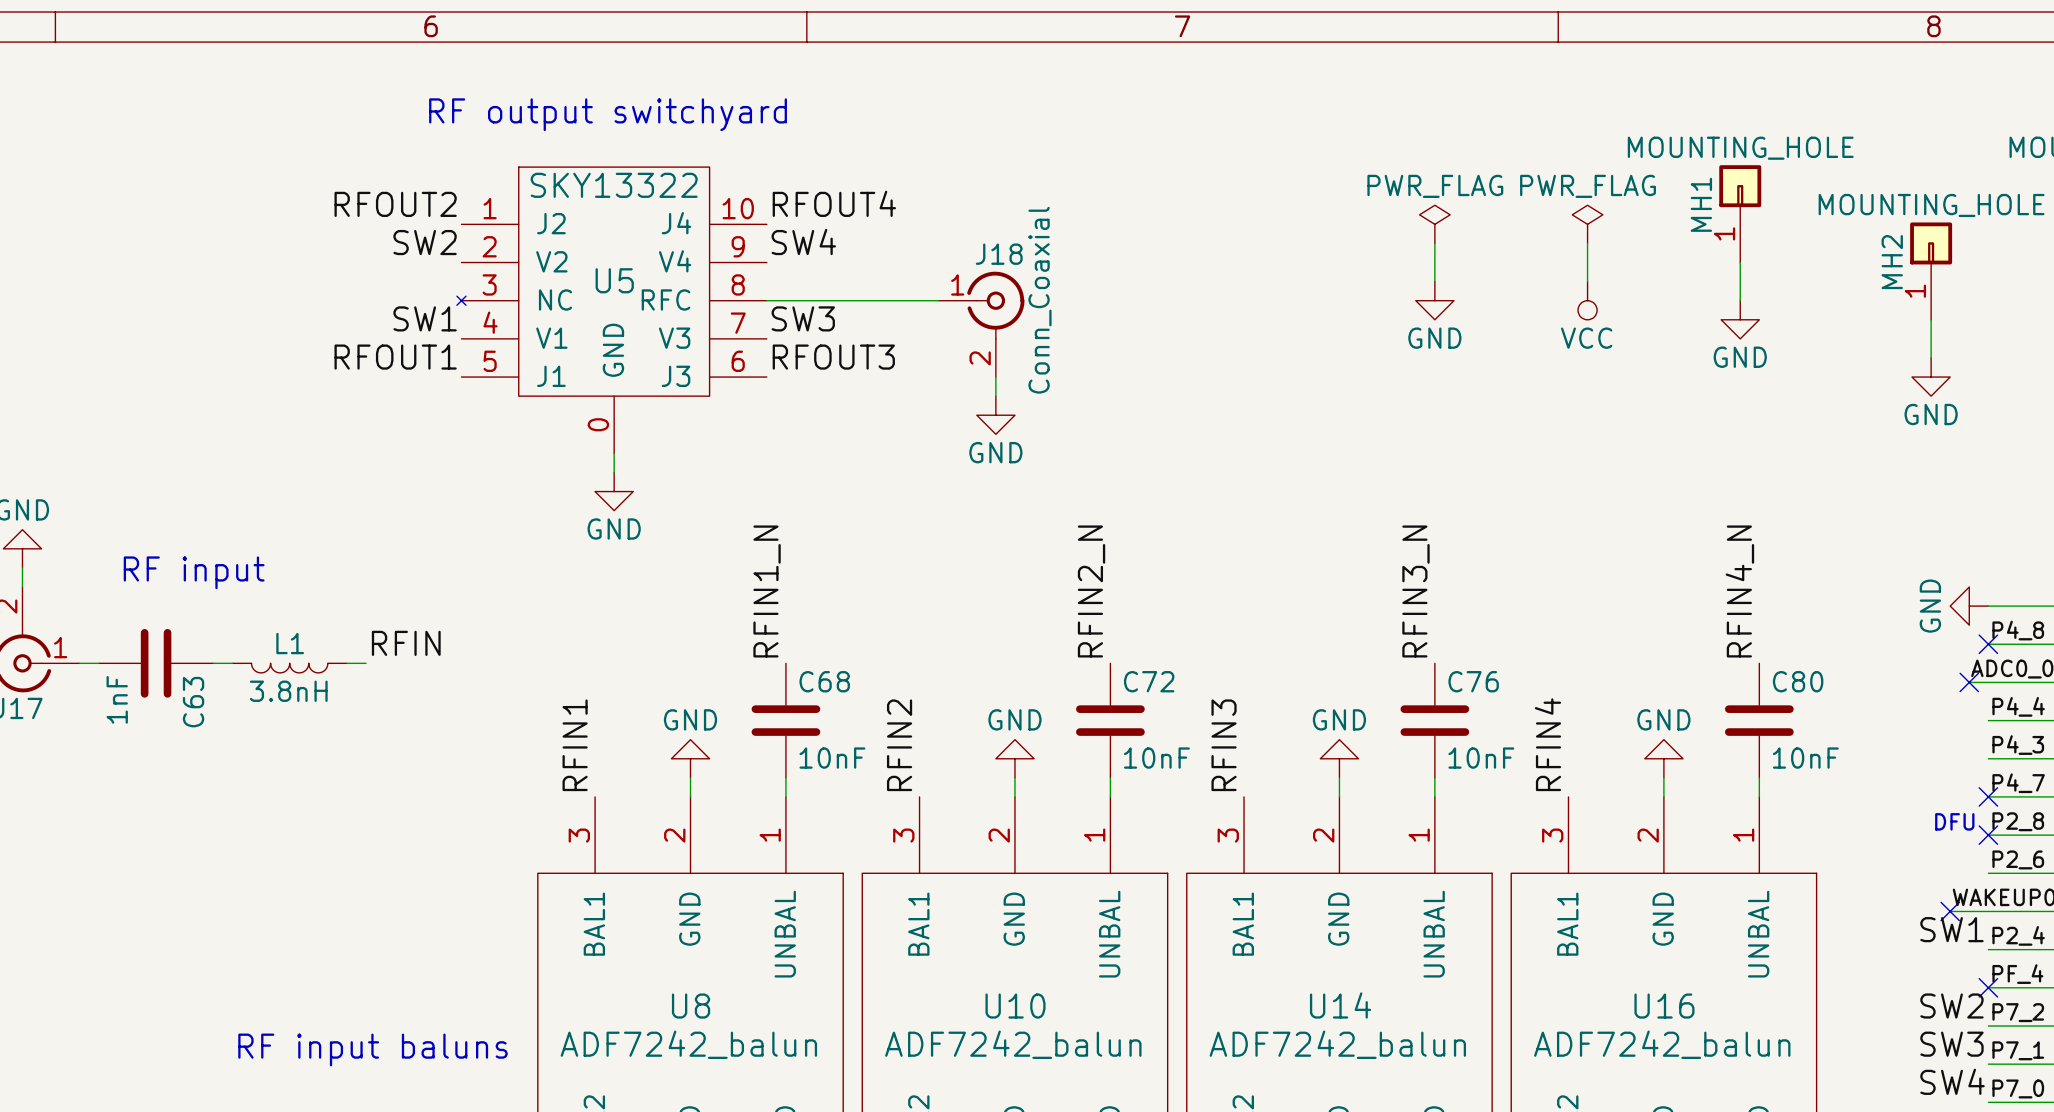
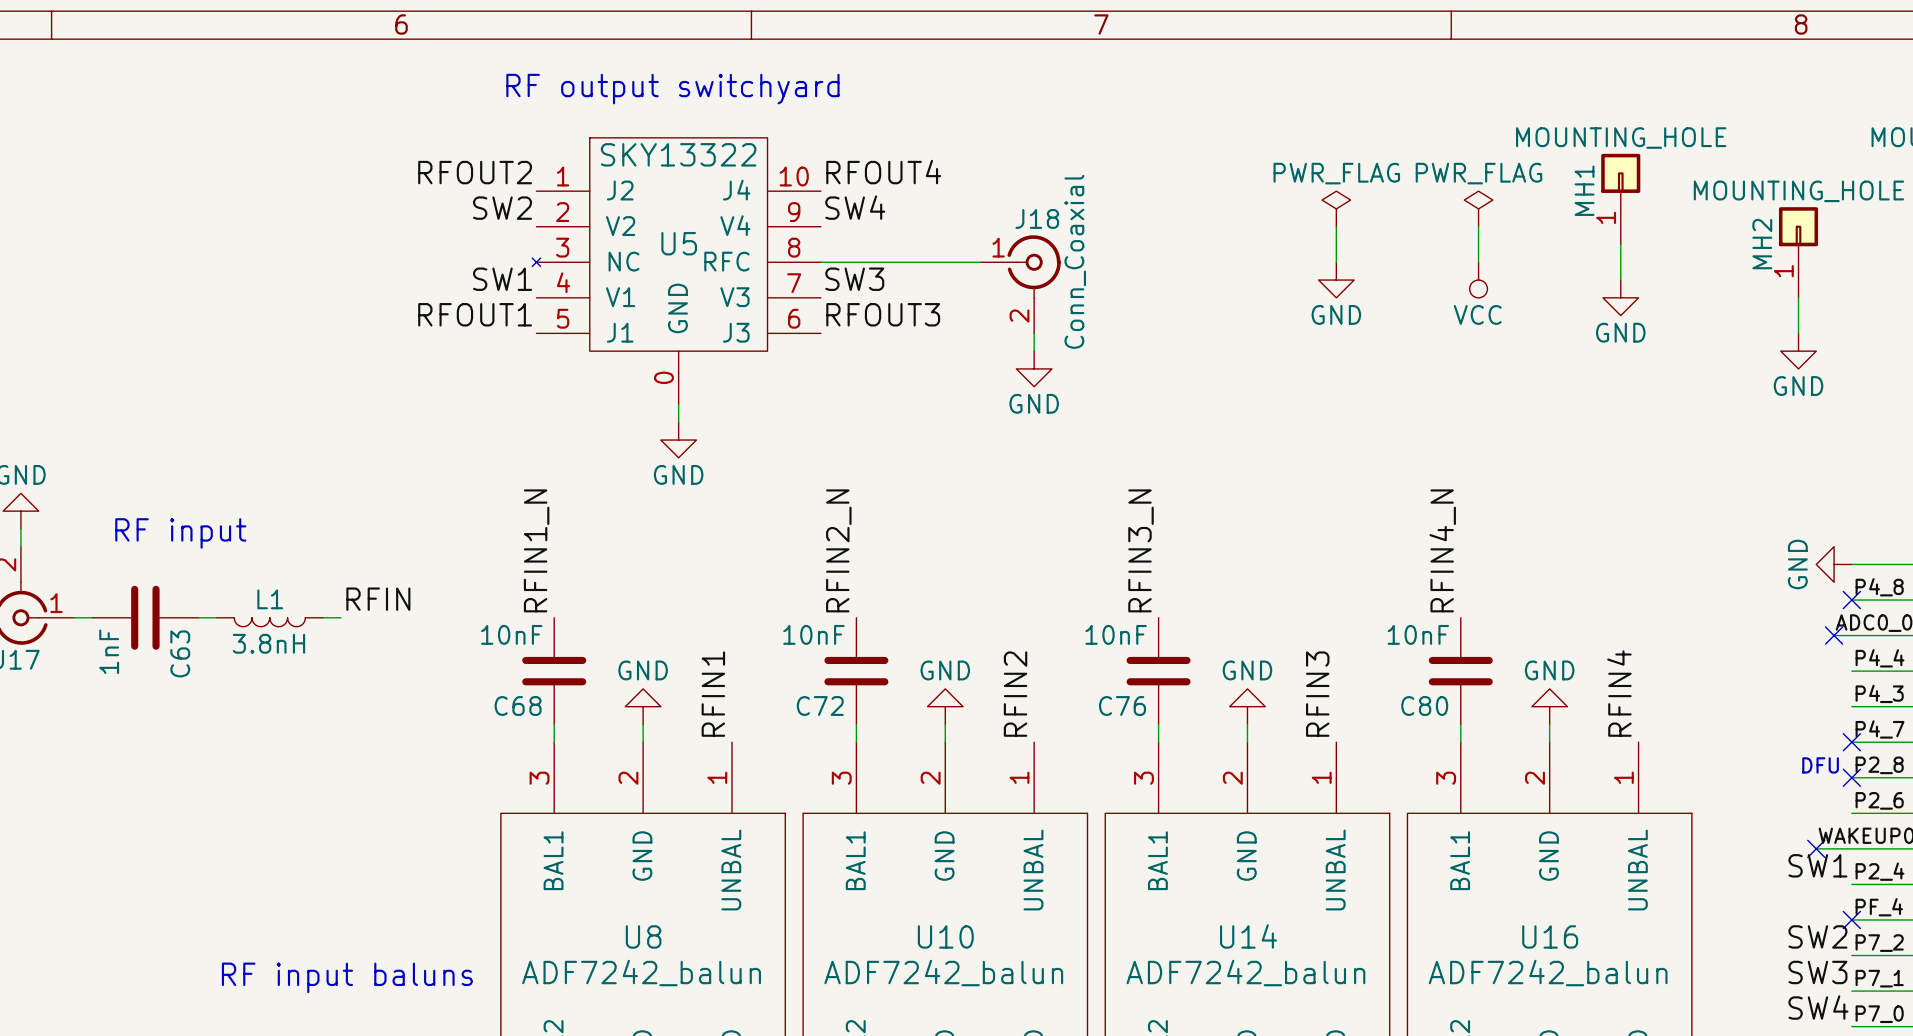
text position: RF output switchyard (608, 114) -> RF output switchyard (672, 89)
label position: RFOUT4 (834, 203) -> RFOUT4 (883, 172)
label position: RFOUT2 (395, 204) -> RFOUT2 (475, 172)
label position: SW2 (425, 242) -> SW2 (502, 208)
label position: SW4 (803, 242) -> SW4 (855, 207)
wire: (766, 300) (938, 300) -> (820, 262) (980, 262)
U5 position: (611, 310) -> (676, 271)
label position: SW1 (425, 318) -> SW1 (502, 279)
label position: SW3 (803, 318) -> SW3 (854, 279)
J18 position: (981, 324) -> (1020, 284)
label position: RFOUT1 (395, 357) -> RFOUT1 (475, 314)
label position: RFOUT3 (833, 357) -> RFOUT3 (883, 314)
wire: (995, 377) (995, 396) -> (1034, 333) (1034, 351)
power symbol position: GND (995, 415) -> GND (1034, 368)
wire: (614, 453) (614, 472) -> (678, 404) (678, 422)
power symbol position: GND (614, 491) -> GND (678, 440)
label position: RFIN1_N (767, 591) -> RFIN1_N (536, 550)
label position: RFIN2_N (1091, 591) -> RFIN2_N (838, 550)
label position: RFIN3_N (1415, 591) -> RFIN3_N (1141, 550)
label position: RFIN4_N (1739, 591) -> RFIN4_N (1442, 550)
C68 name position: C68 (824, 681) -> C68 (518, 706)
C72 name position: C72 (1149, 681) -> C72 (820, 706)
C76 name position: C76 (1473, 681) -> C76 (1122, 706)
C80 name position: C80 (1798, 681) -> C80 (1424, 706)
C68 position: (785, 720) -> (554, 671)
C72 position: (1110, 720) -> (856, 671)
C76 position: (1434, 720) -> (1158, 671)
C80 position: (1759, 720) -> (1460, 671)
label position: RFIN4 (1547, 744) -> RFIN4 (1619, 693)
label position: RFIN1 (575, 745) -> RFIN1 (713, 694)
label position: RFIN2 (899, 745) -> RFIN2 (1015, 694)
label position: RFIN3 (1224, 745) -> RFIN3 (1317, 694)
C68 value position: 10nF (832, 758) -> 10nF (511, 634)
C72 value position: 10nF (1156, 758) -> 10nF (813, 634)
C76 value position: 10nF (1481, 758) -> 10nF (1116, 634)
C80 value position: 10nF (1805, 758) -> 10nF (1418, 634)
wire: (785, 777) (785, 796) -> (554, 724) (554, 742)
wire: (1110, 777) (1110, 796) -> (856, 724) (856, 742)
wire: (1434, 777) (1434, 796) -> (1158, 724) (1158, 742)
wire: (1759, 777) (1759, 796) -> (1460, 724) (1460, 742)

